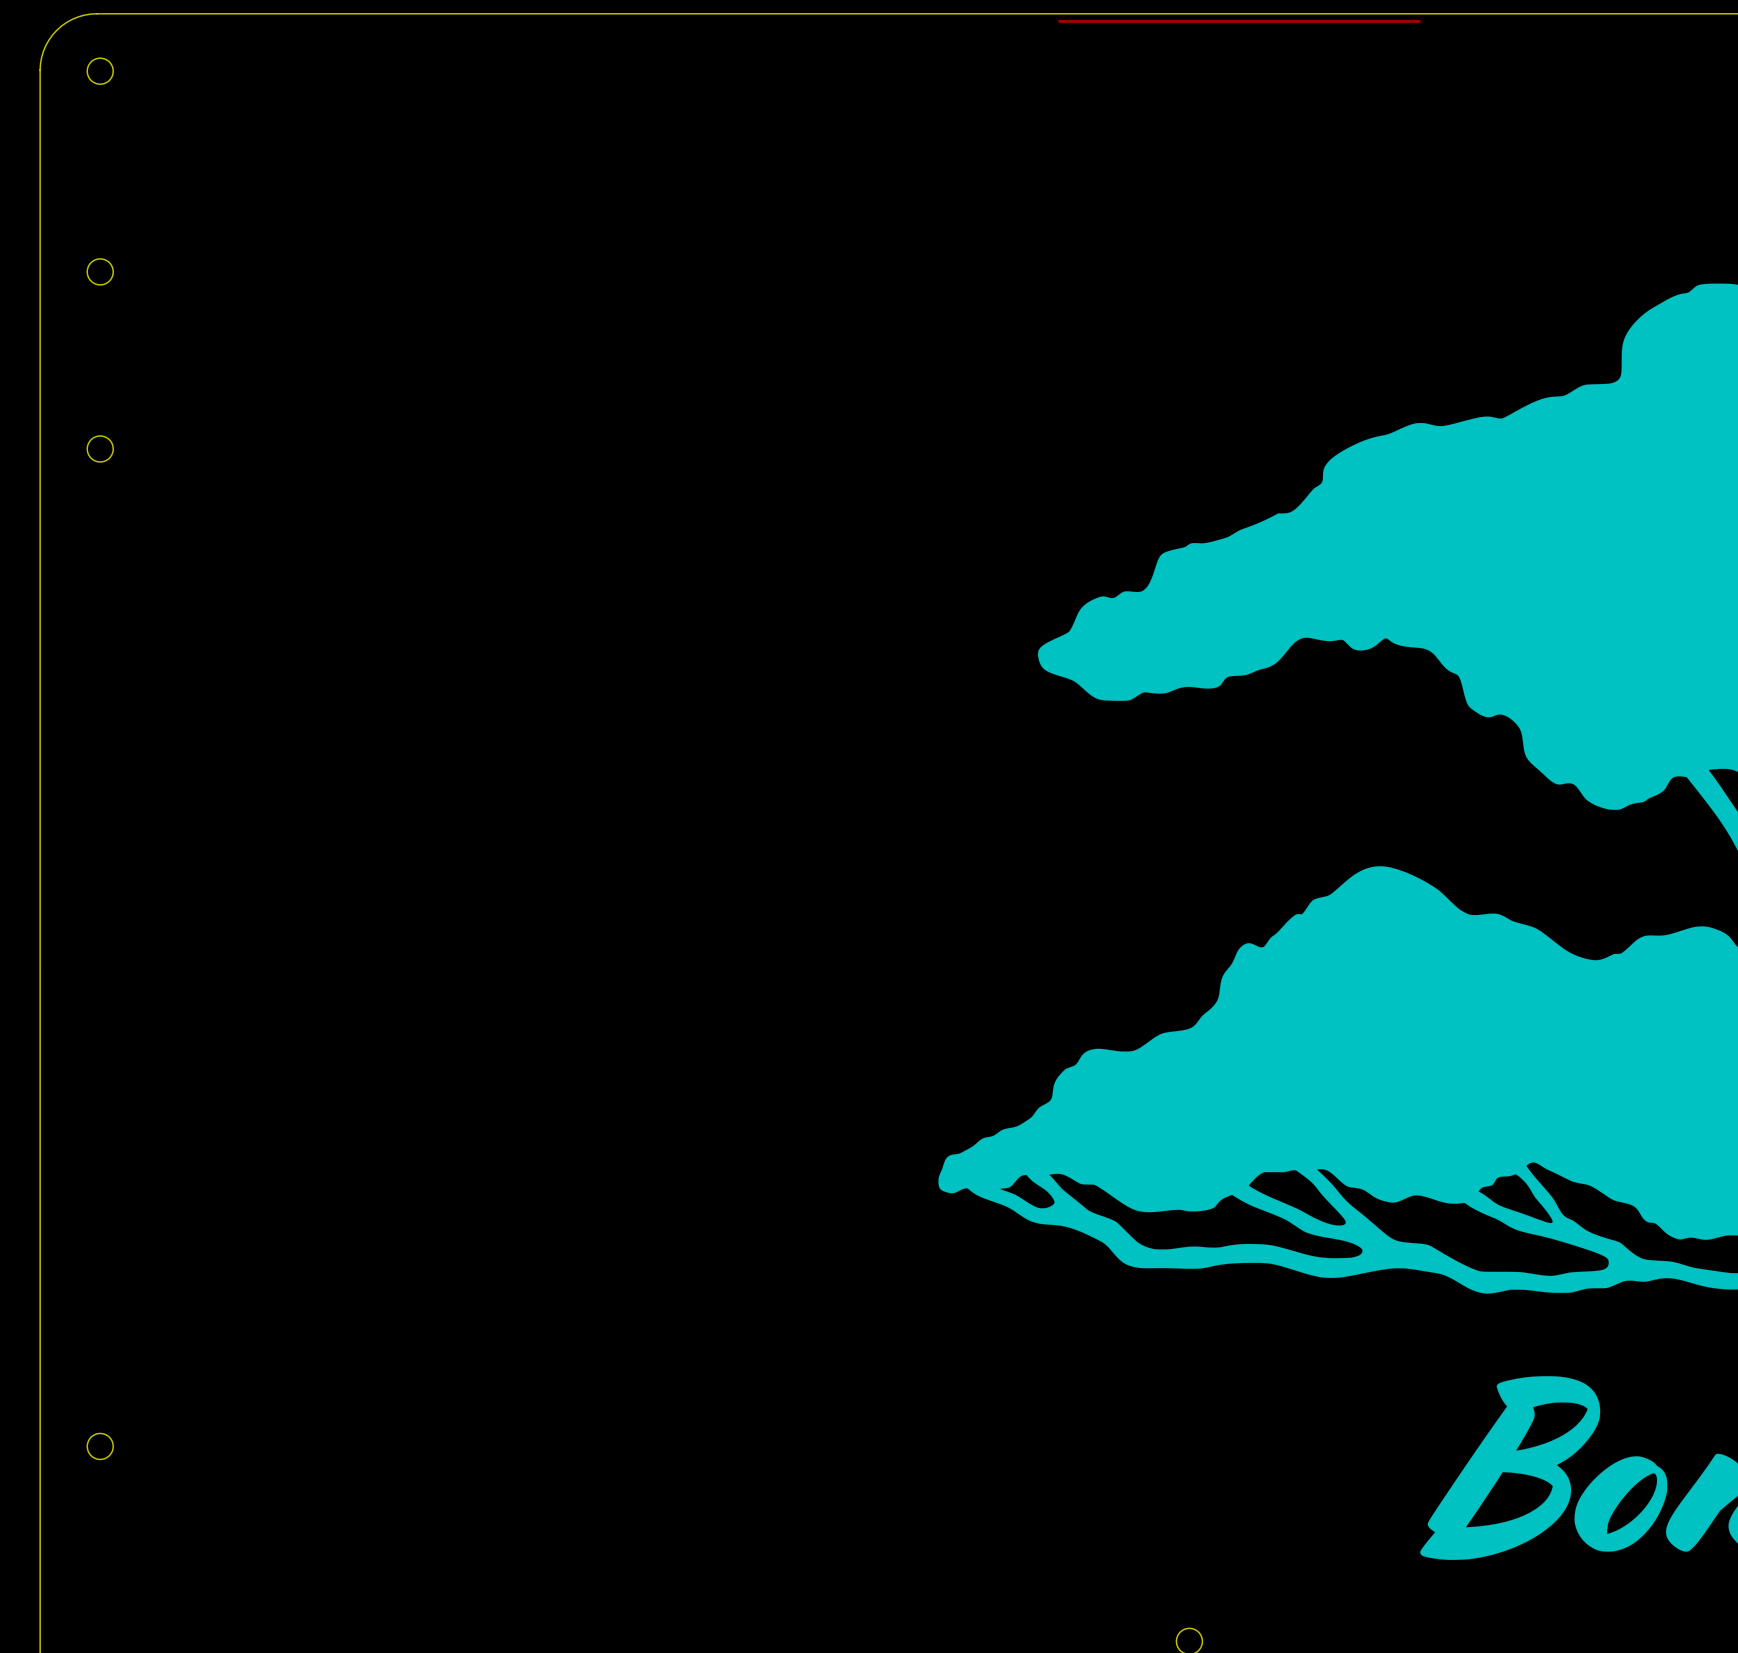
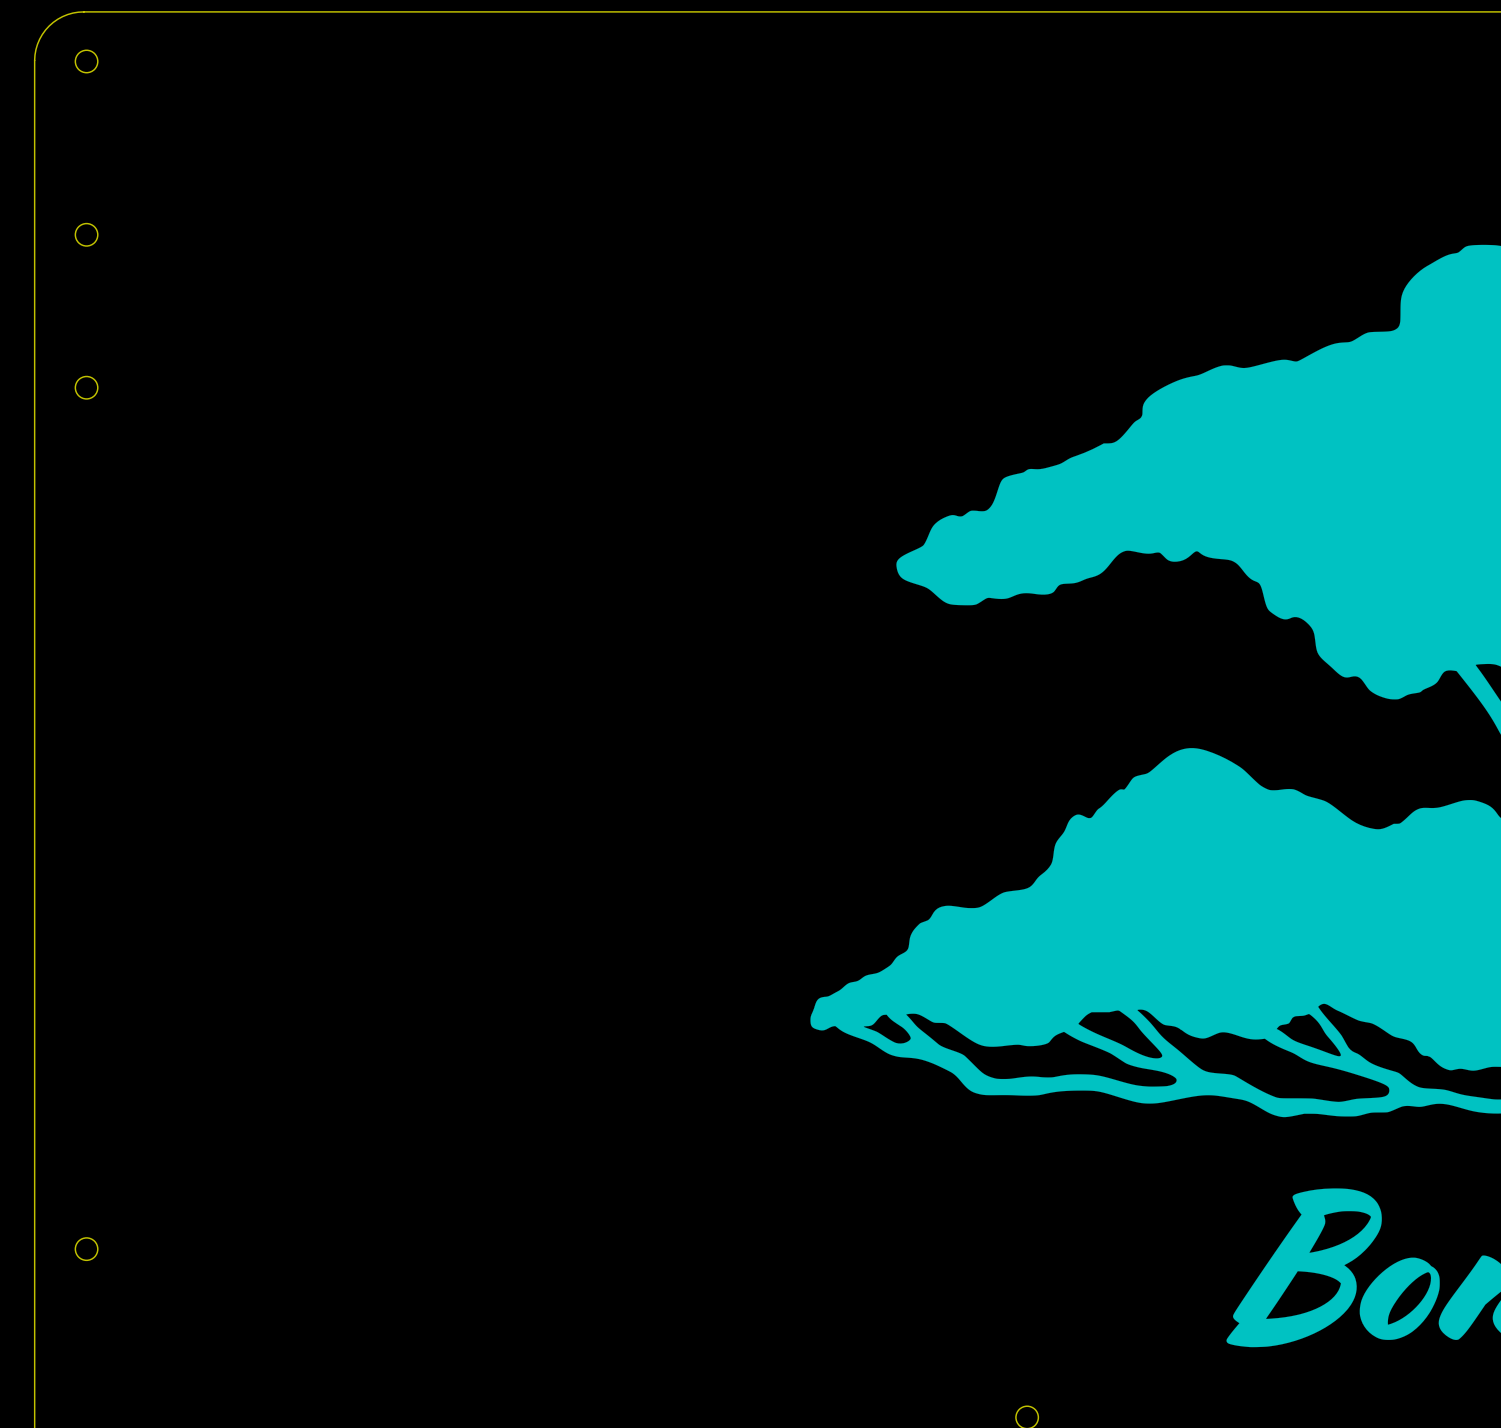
top track: (1419, 21) (1059, 21) -> none

